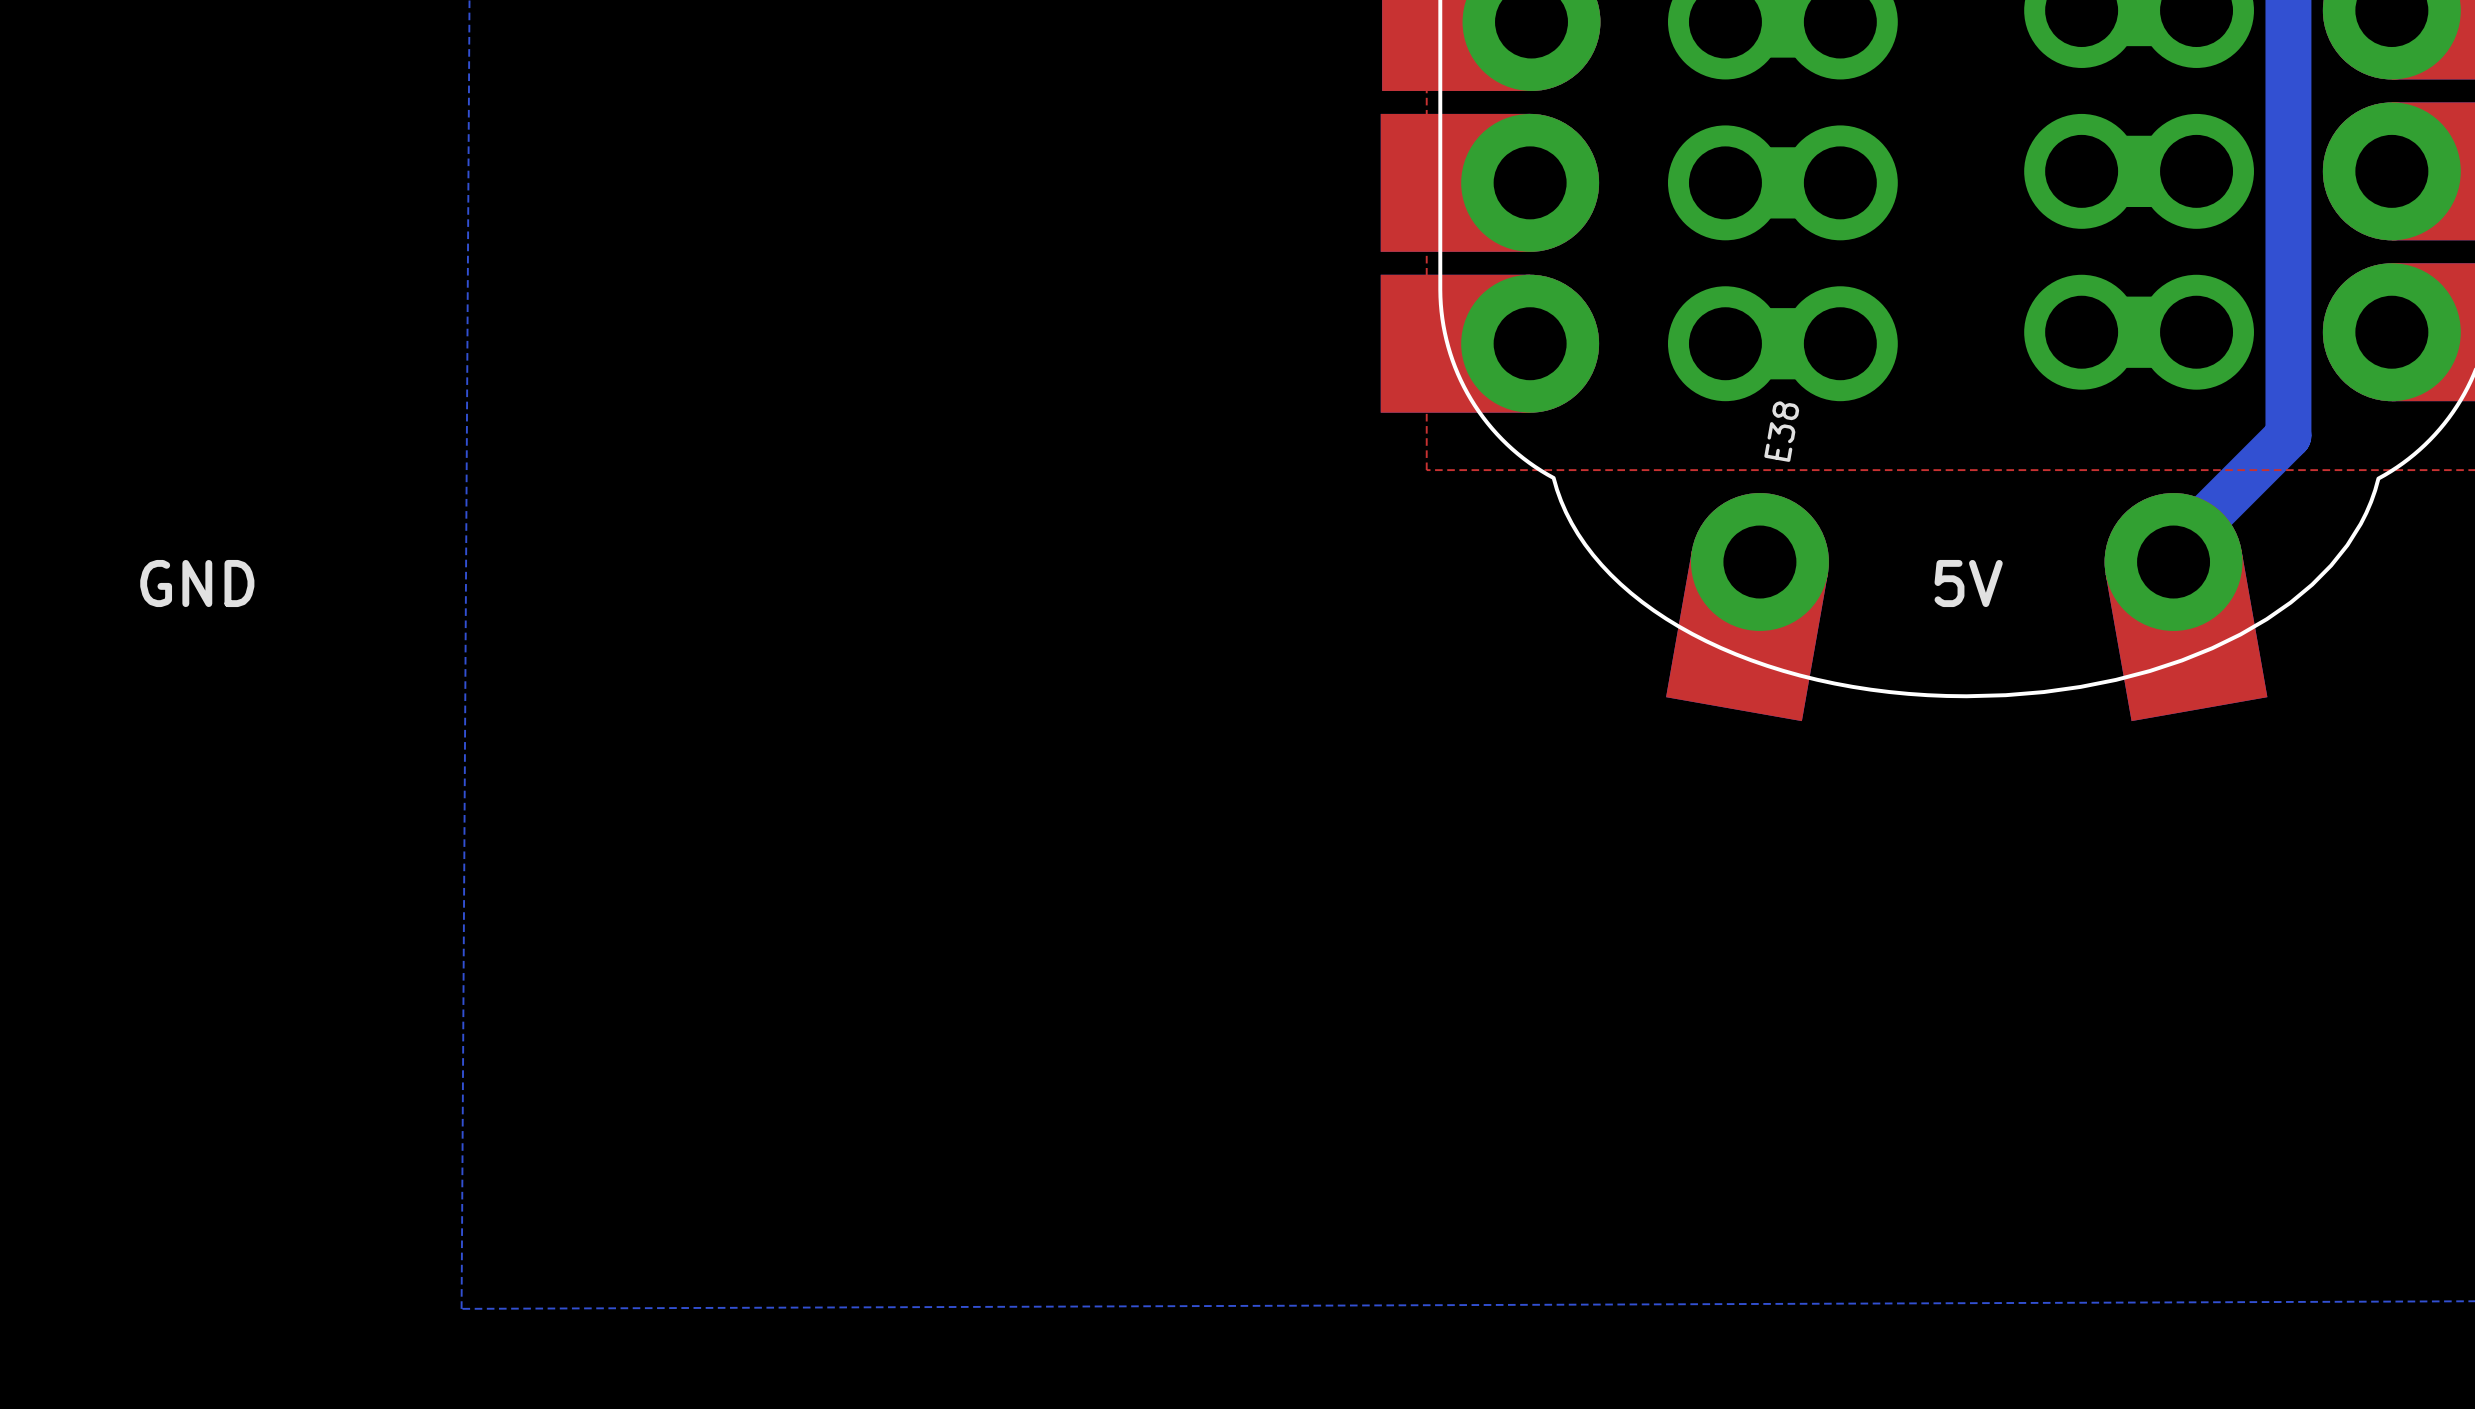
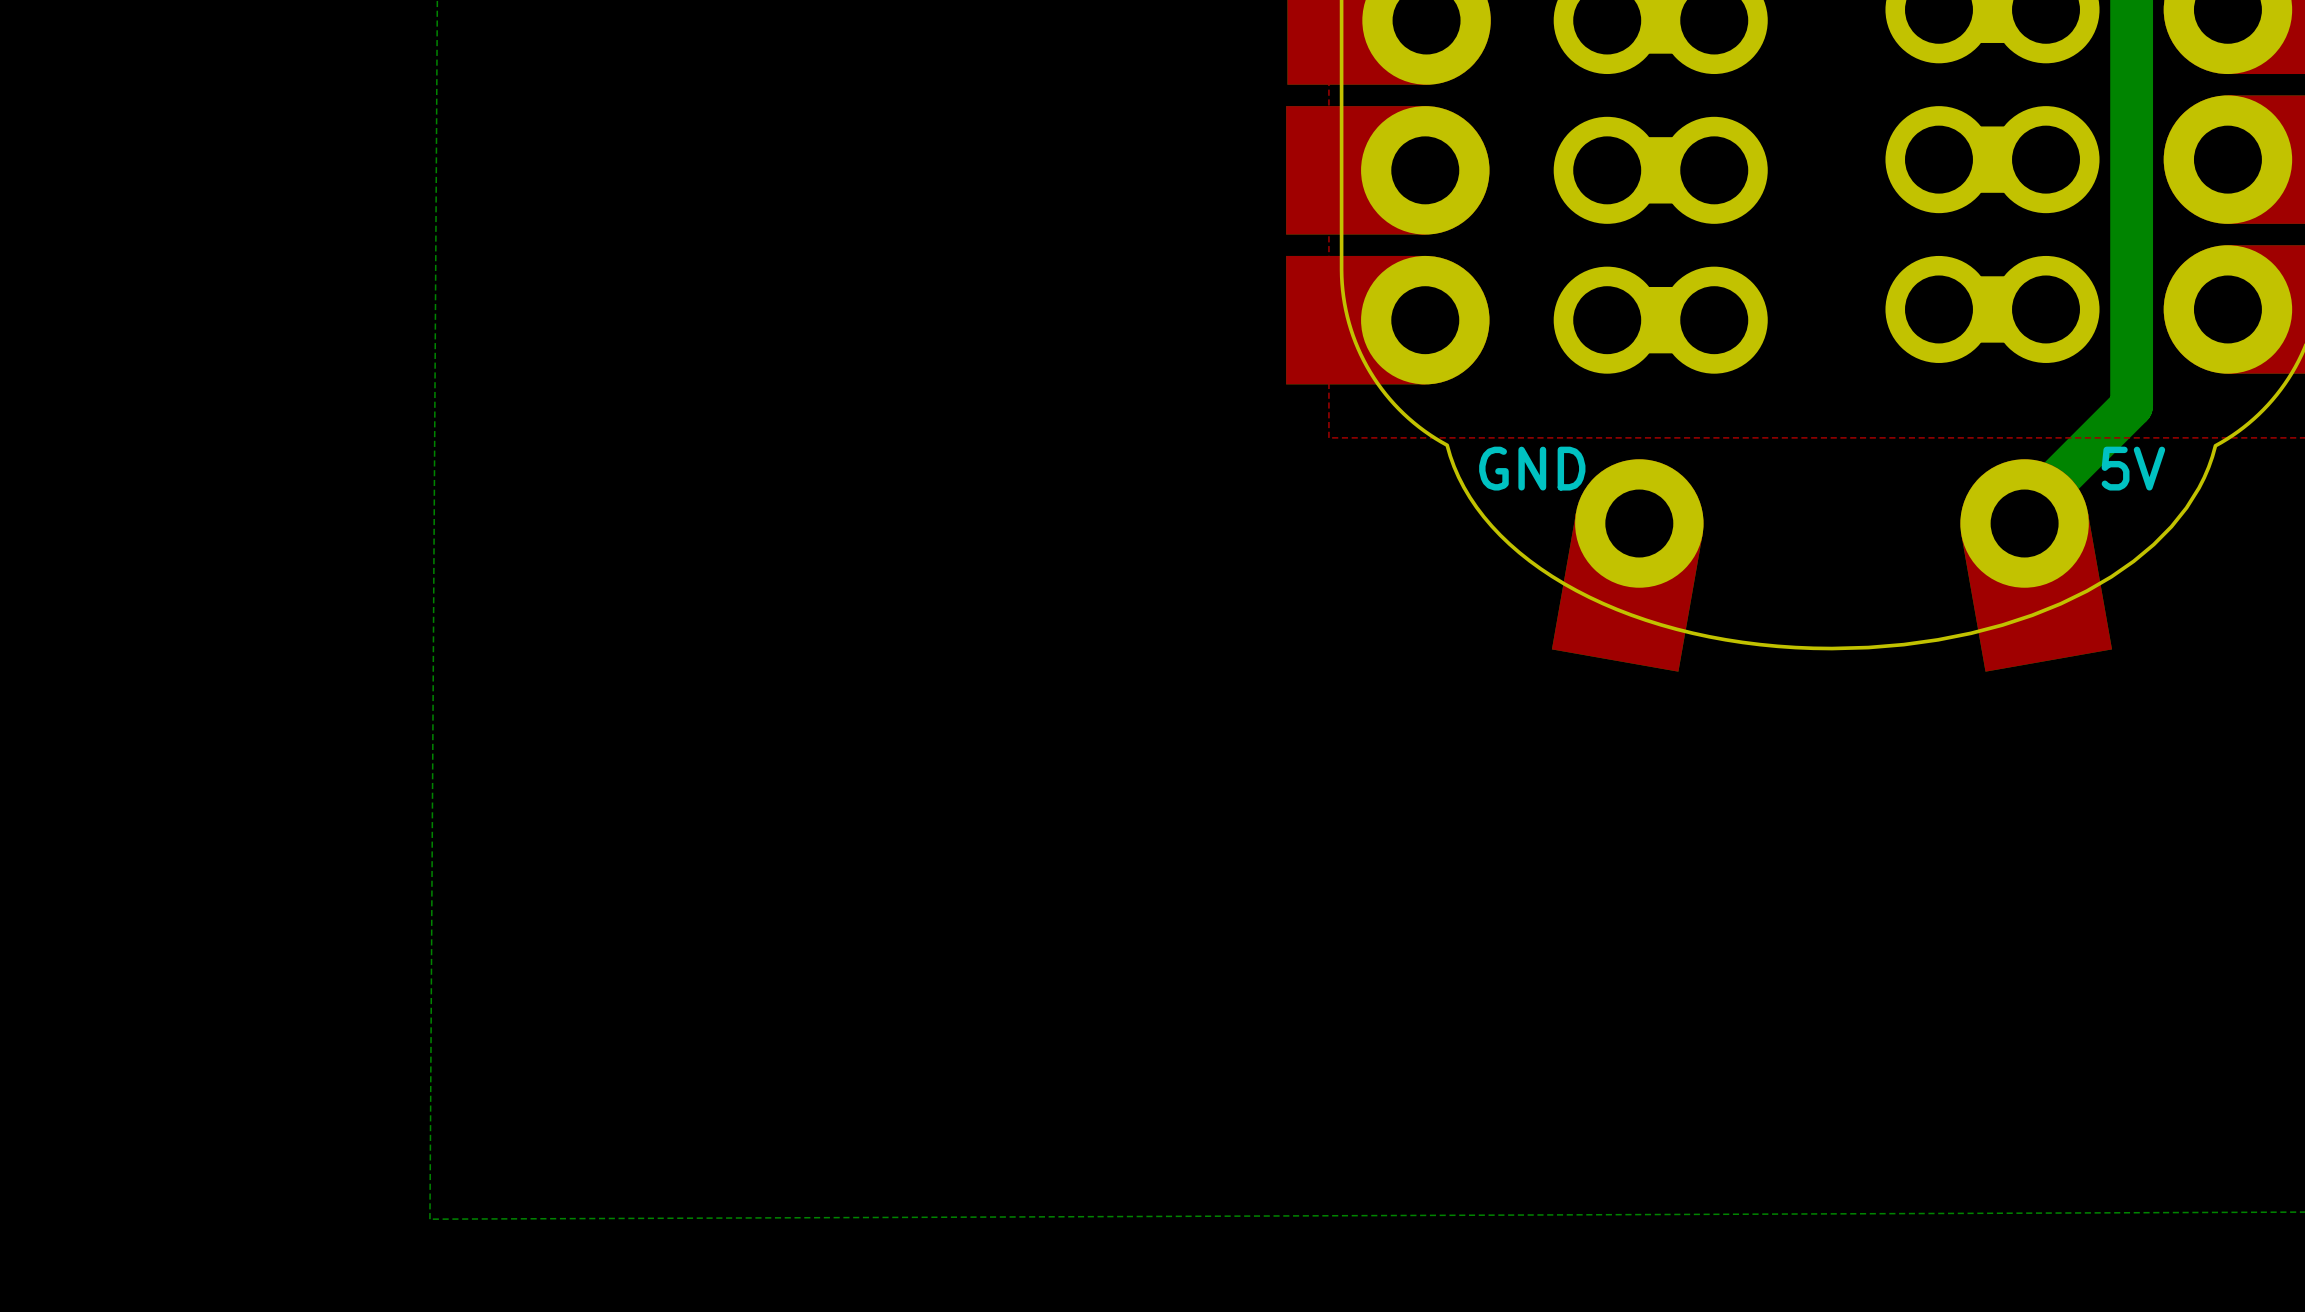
E38 name: E38 (1781, 431) -> none
text: none -> GND (1532, 468)
text: GND (197, 583) -> none
text position: 5V (1968, 583) -> 5V (2133, 468)

